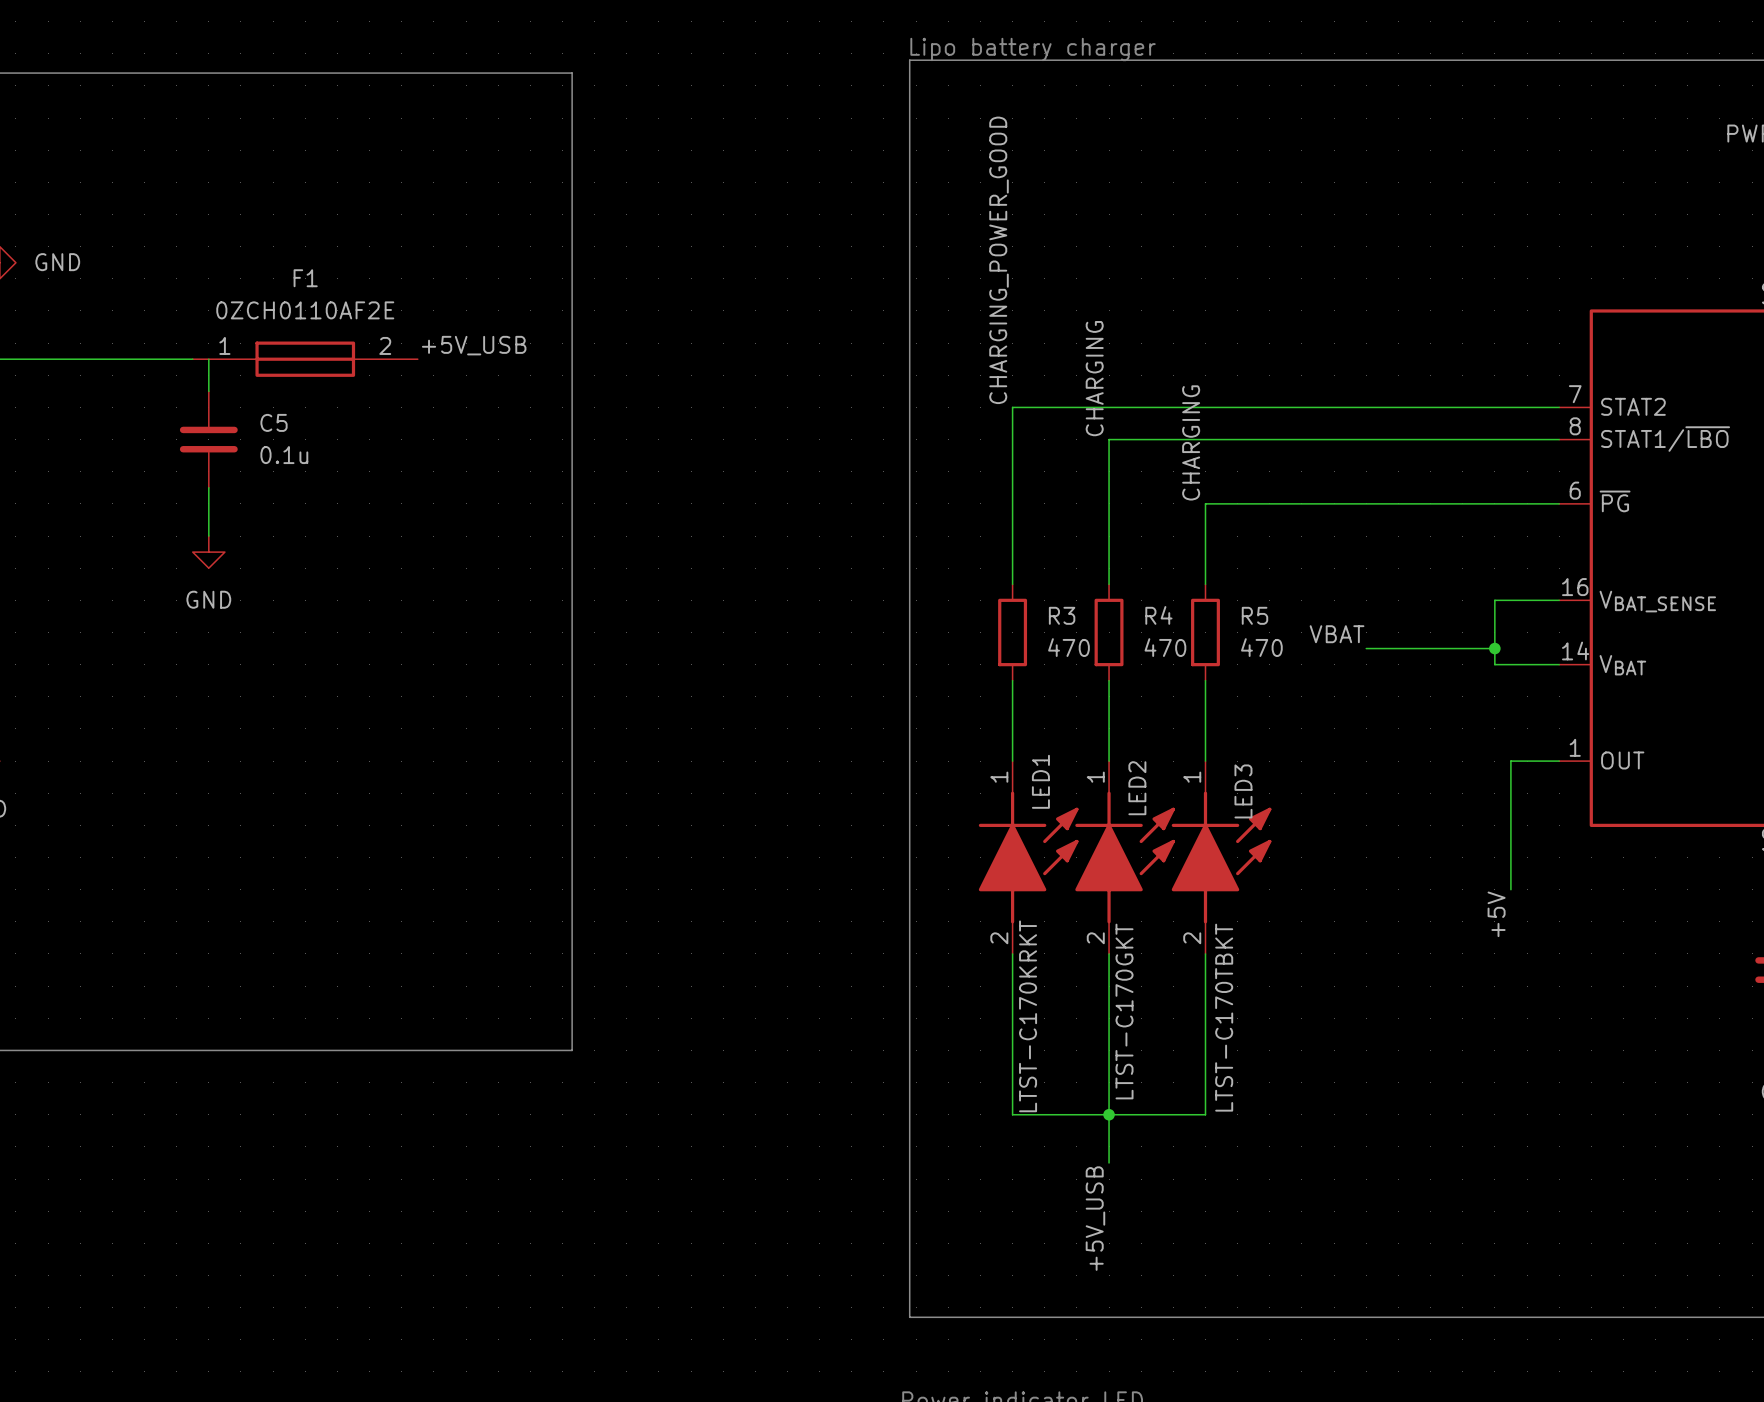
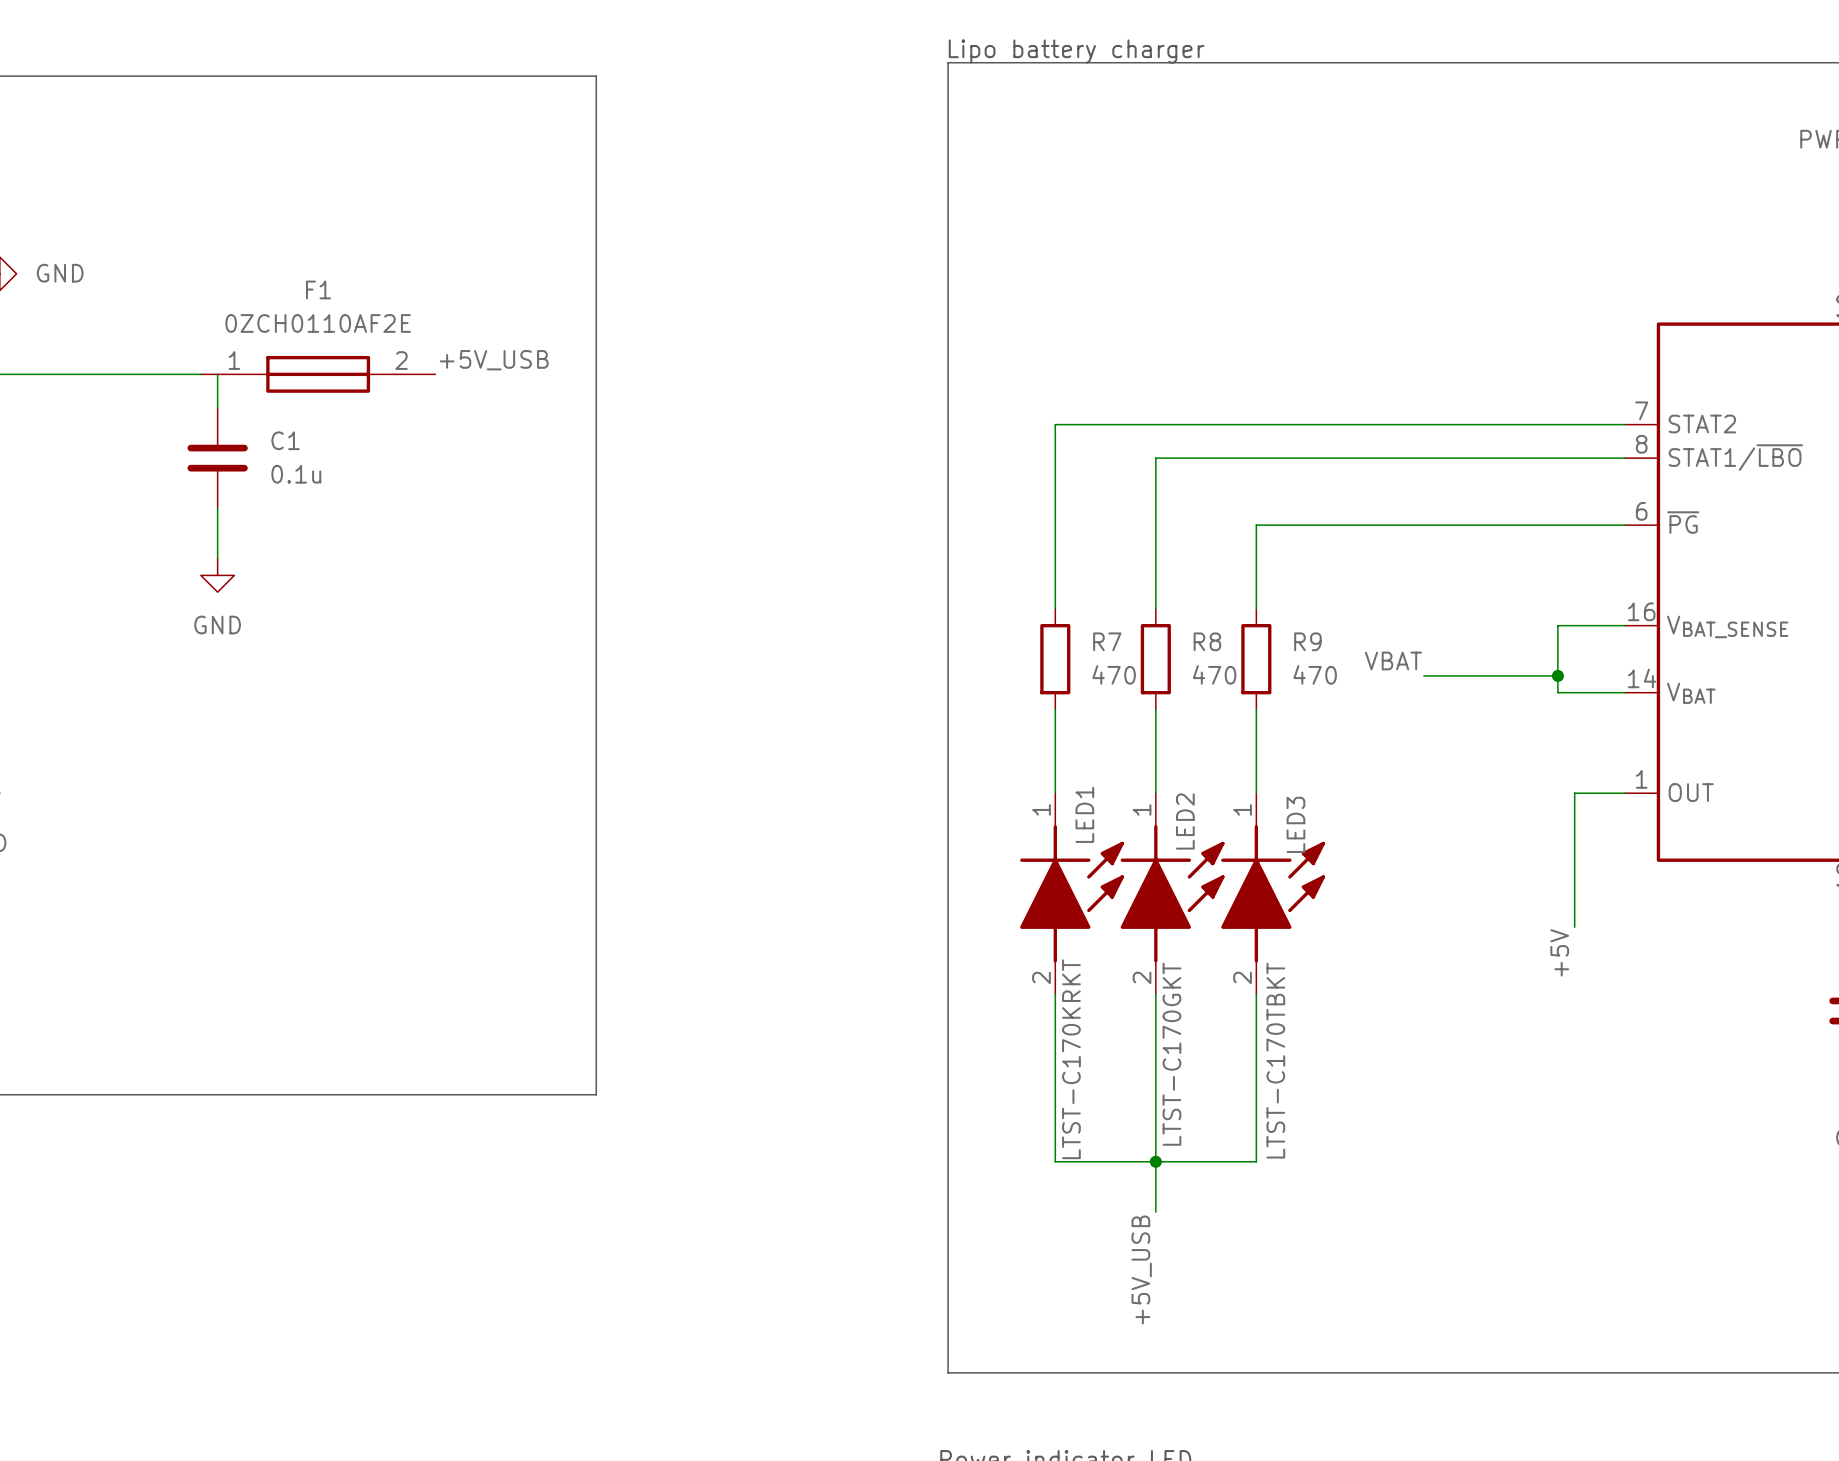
label: CHARGING_POWER_GOOD (999, 260) -> none
label: CHARGING (1094, 378) -> none
C5 name: C5 (274, 422) -> C1 (285, 440)
label: CHARGING (1191, 442) -> none
R3 name: R3 (1062, 615) -> R7 (1107, 641)
R4 name: R4 (1158, 615) -> R8 (1207, 641)
R5 name: R5 (1254, 615) -> R9 (1307, 641)

